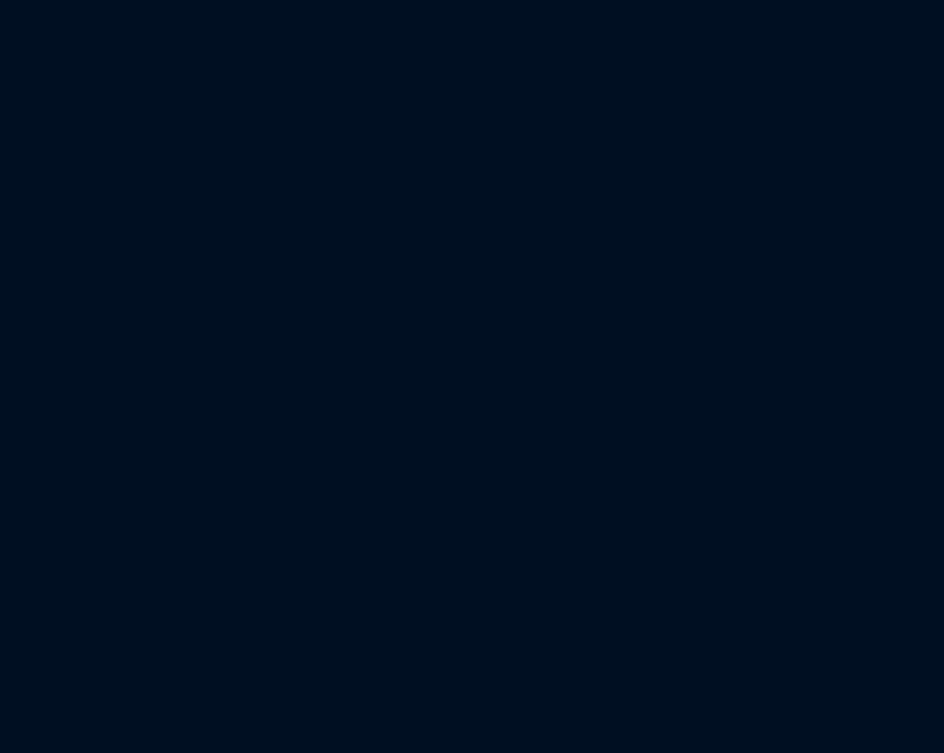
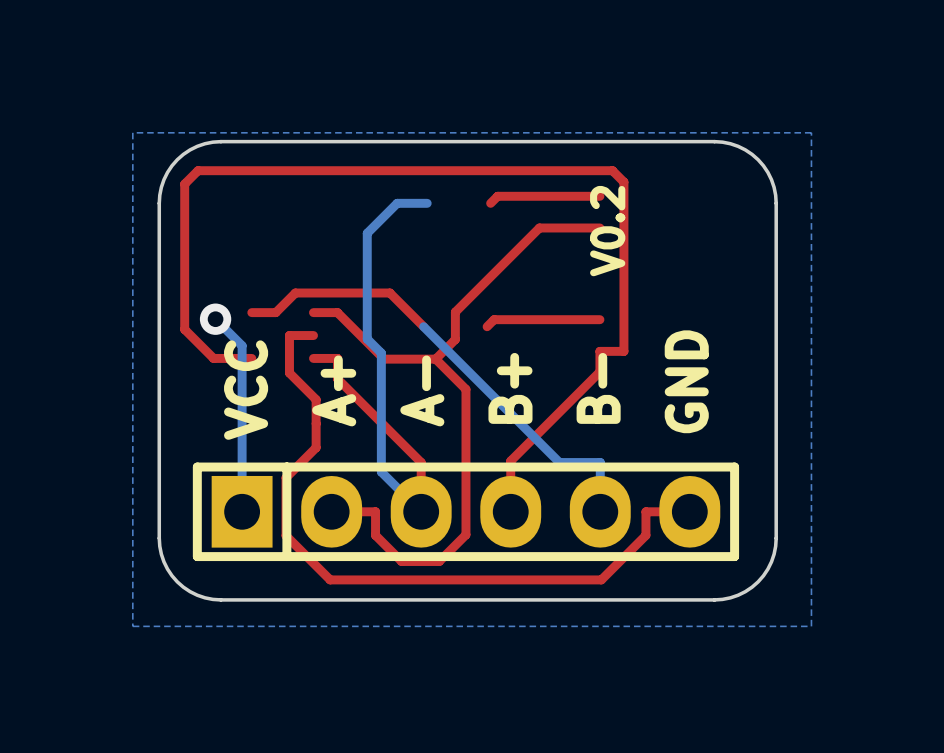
bottom zone outline: none -> (811, 132) (132, 132) (132, 626) (811, 626) (811, 132)
board edge: none -> (714, 141) (220, 141) (204, 143) (183, 154) (167, 172) (161, 187) (159, 203) (159, 538) (161, 554) (172, 575) (190, 591) (204, 597) (220, 599) (714, 599) (730, 597) (752, 587) (767, 569) (774, 554) (776, 538) (775, 195) (767, 172) (758, 159) (738, 146) (714, 141)
top track: none -> (599, 196) (497, 196) (490, 203)
bottom track: none -> (427, 203) (397, 203) (367, 233) (367, 339) (381, 353) (381, 471) (421, 511)
top track: none -> (599, 227) (539, 227) (455, 312) (455, 339) (435, 359)
text: none -> V0.2 (607, 231)
top track: none -> (251, 312) (275, 312) (295, 293) (389, 293) (423, 326)
top track: none -> (313, 312) (337, 312) (384, 359) (435, 359)
bottom track: none -> (215, 319) (242, 345) (242, 511)
via: none -> (215, 319)
top track: none -> (599, 319) (494, 319) (487, 326)
bottom track: none -> (423, 326) (559, 462) (600, 462) (600, 511)
top track: none -> (313, 335) (289, 335) (289, 373) (316, 399) (316, 447) (286, 477) (286, 535) (330, 579) (601, 579) (645, 535) (645, 511) (689, 511)
top track: none -> (251, 358) (213, 358) (184, 329) (184, 184) (198, 170) (612, 170) (623, 182) (623, 351) (599, 351) (599, 371) (510, 461) (510, 511)
top track: none -> (313, 358) (337, 358) (337, 378) (421, 462) (421, 511)
top track: none -> (435, 359) (465, 389) (465, 534) (439, 561) (401, 561) (375, 535) (375, 511) (331, 511)
text: none -> GND (686, 381)
text: none -> B+ (510, 388)
text: none -> B- (598, 388)
text: none -> VCC (246, 390)
text: none -> A+ (334, 390)
text: none -> A- (422, 390)
part: none -> (465, 511)

